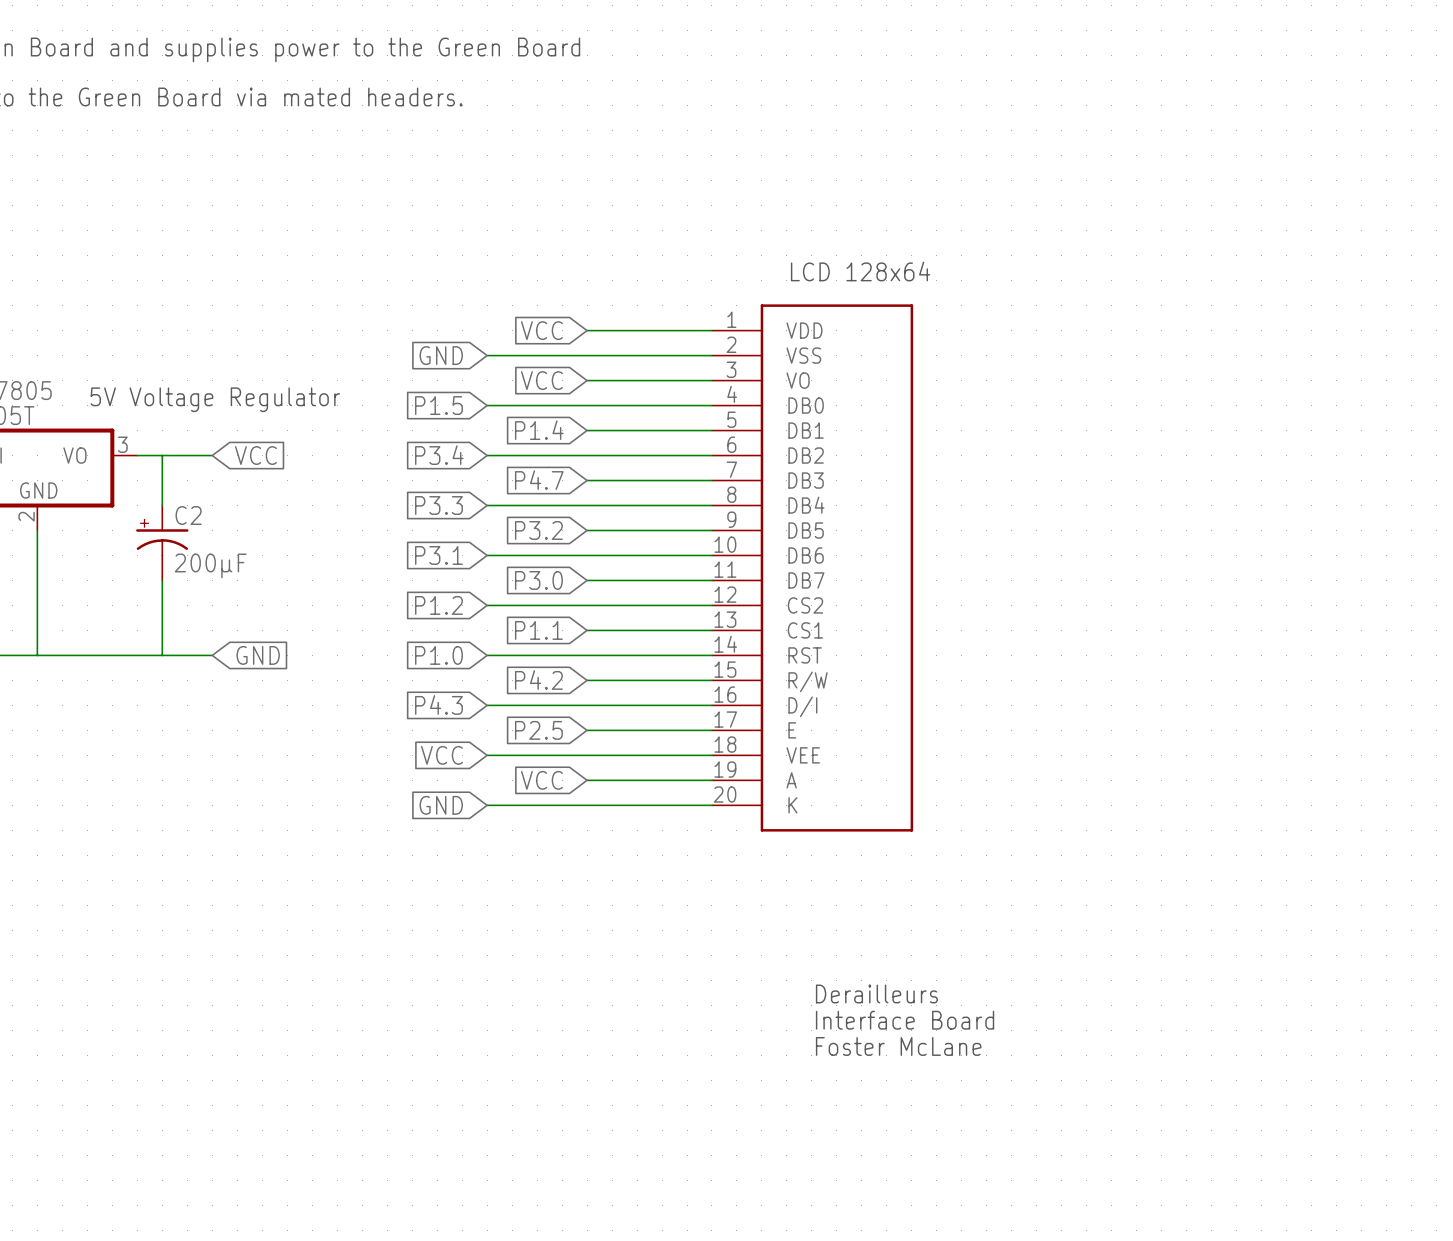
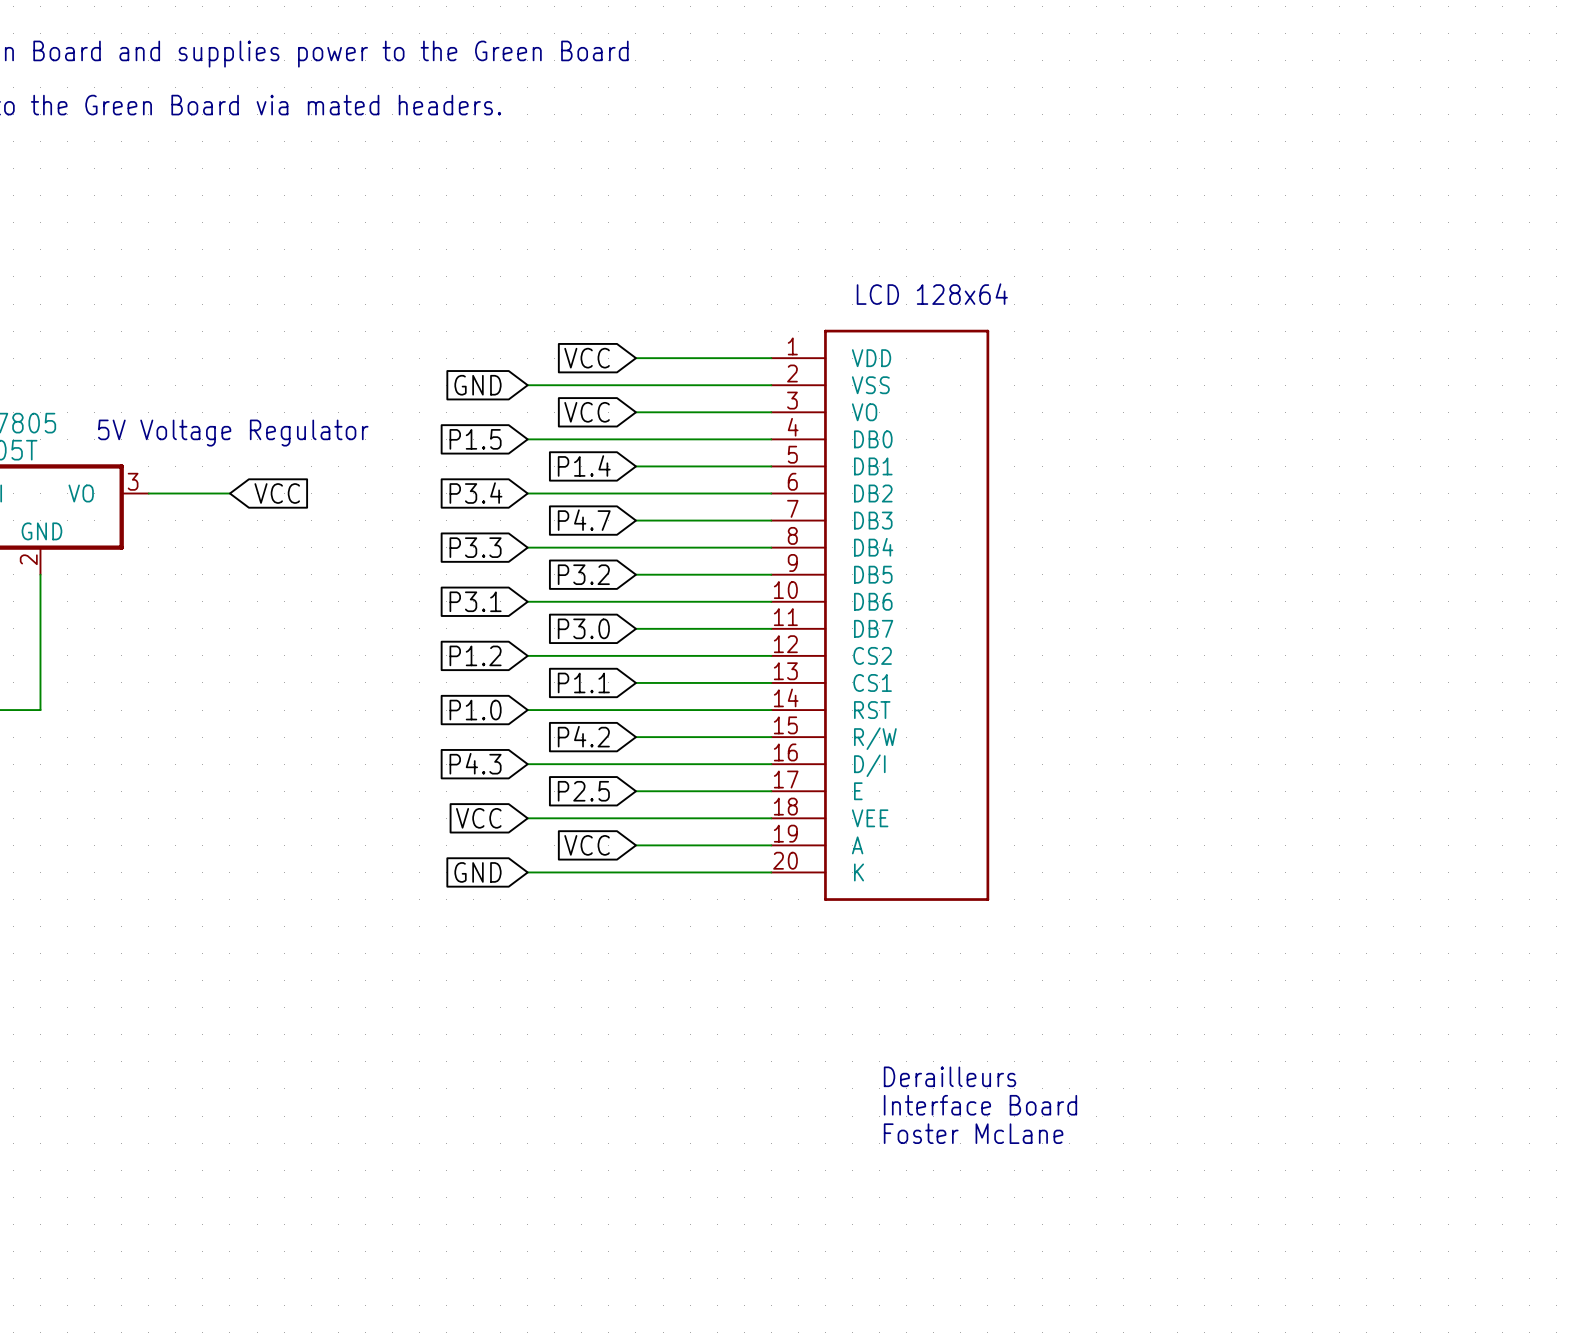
wire: (162, 455) (162, 505) -> none
C2: 200µF (162, 542) -> none
wire: (162, 580) (162, 655) -> none
wire: (37, 655) (212, 655) -> none
global label: GND (258, 655) -> none

